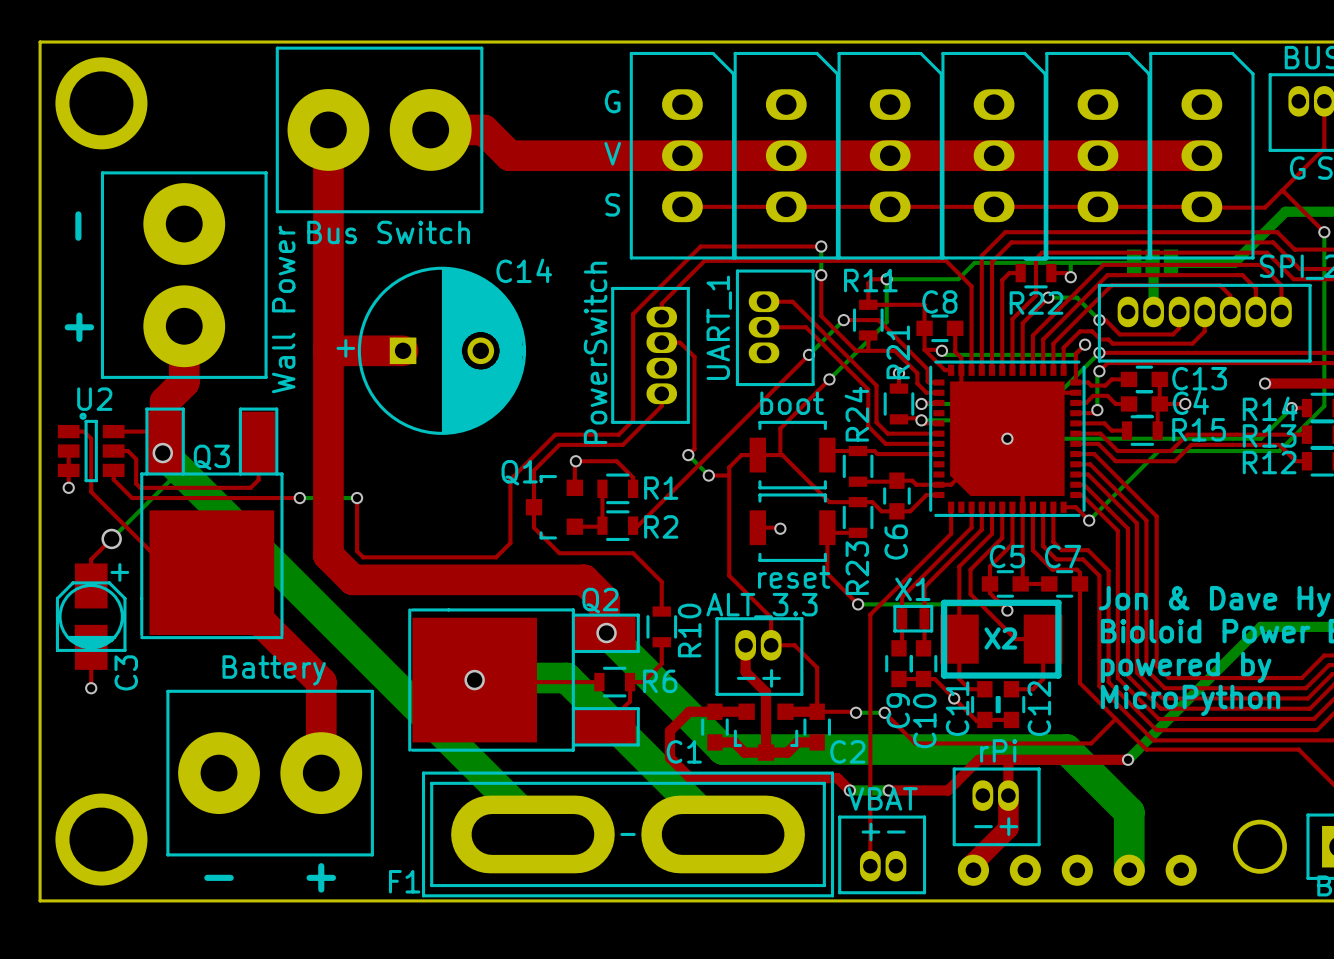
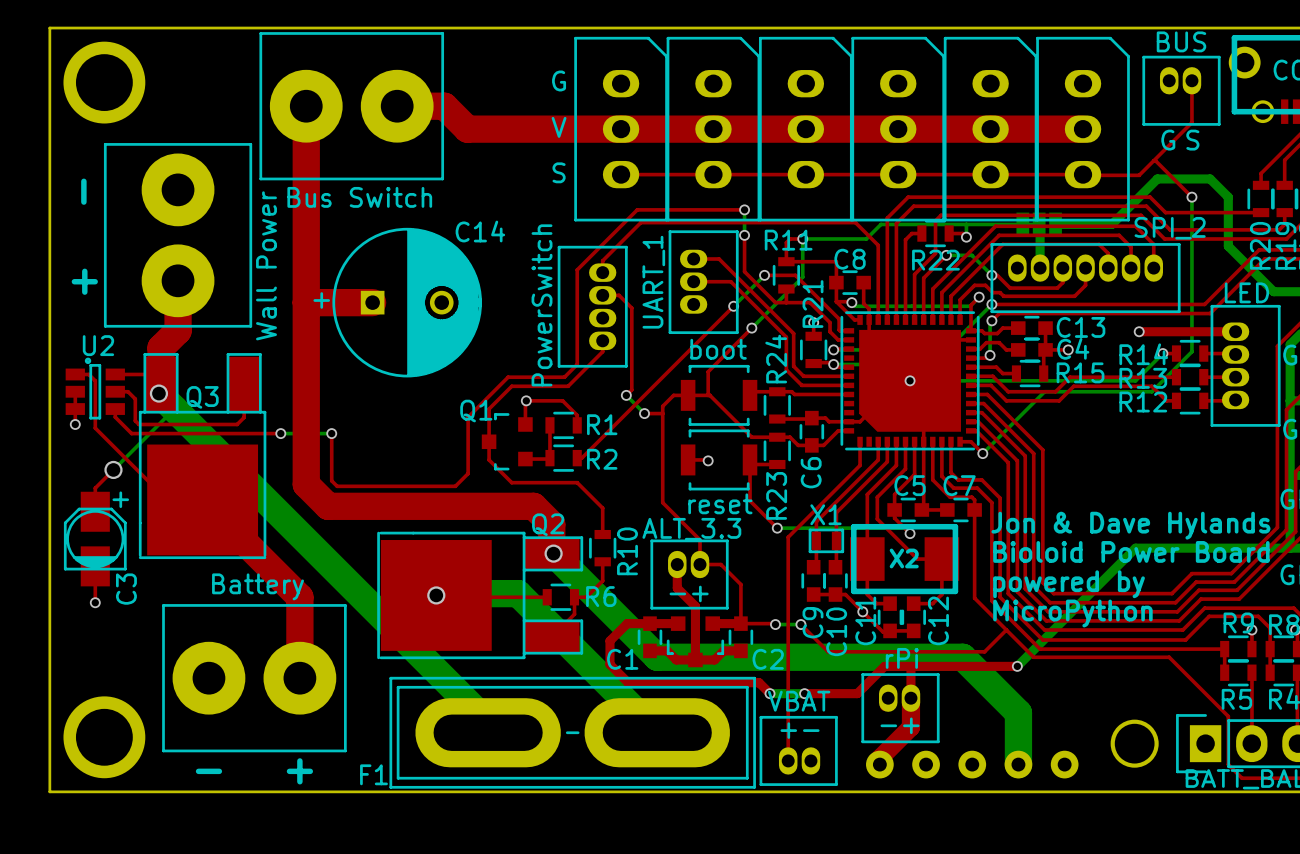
PowerSwitch name: PowerSwitch (595, 352) -> none
PowerSwitch value: none -> PowerSwitch (542, 305)

